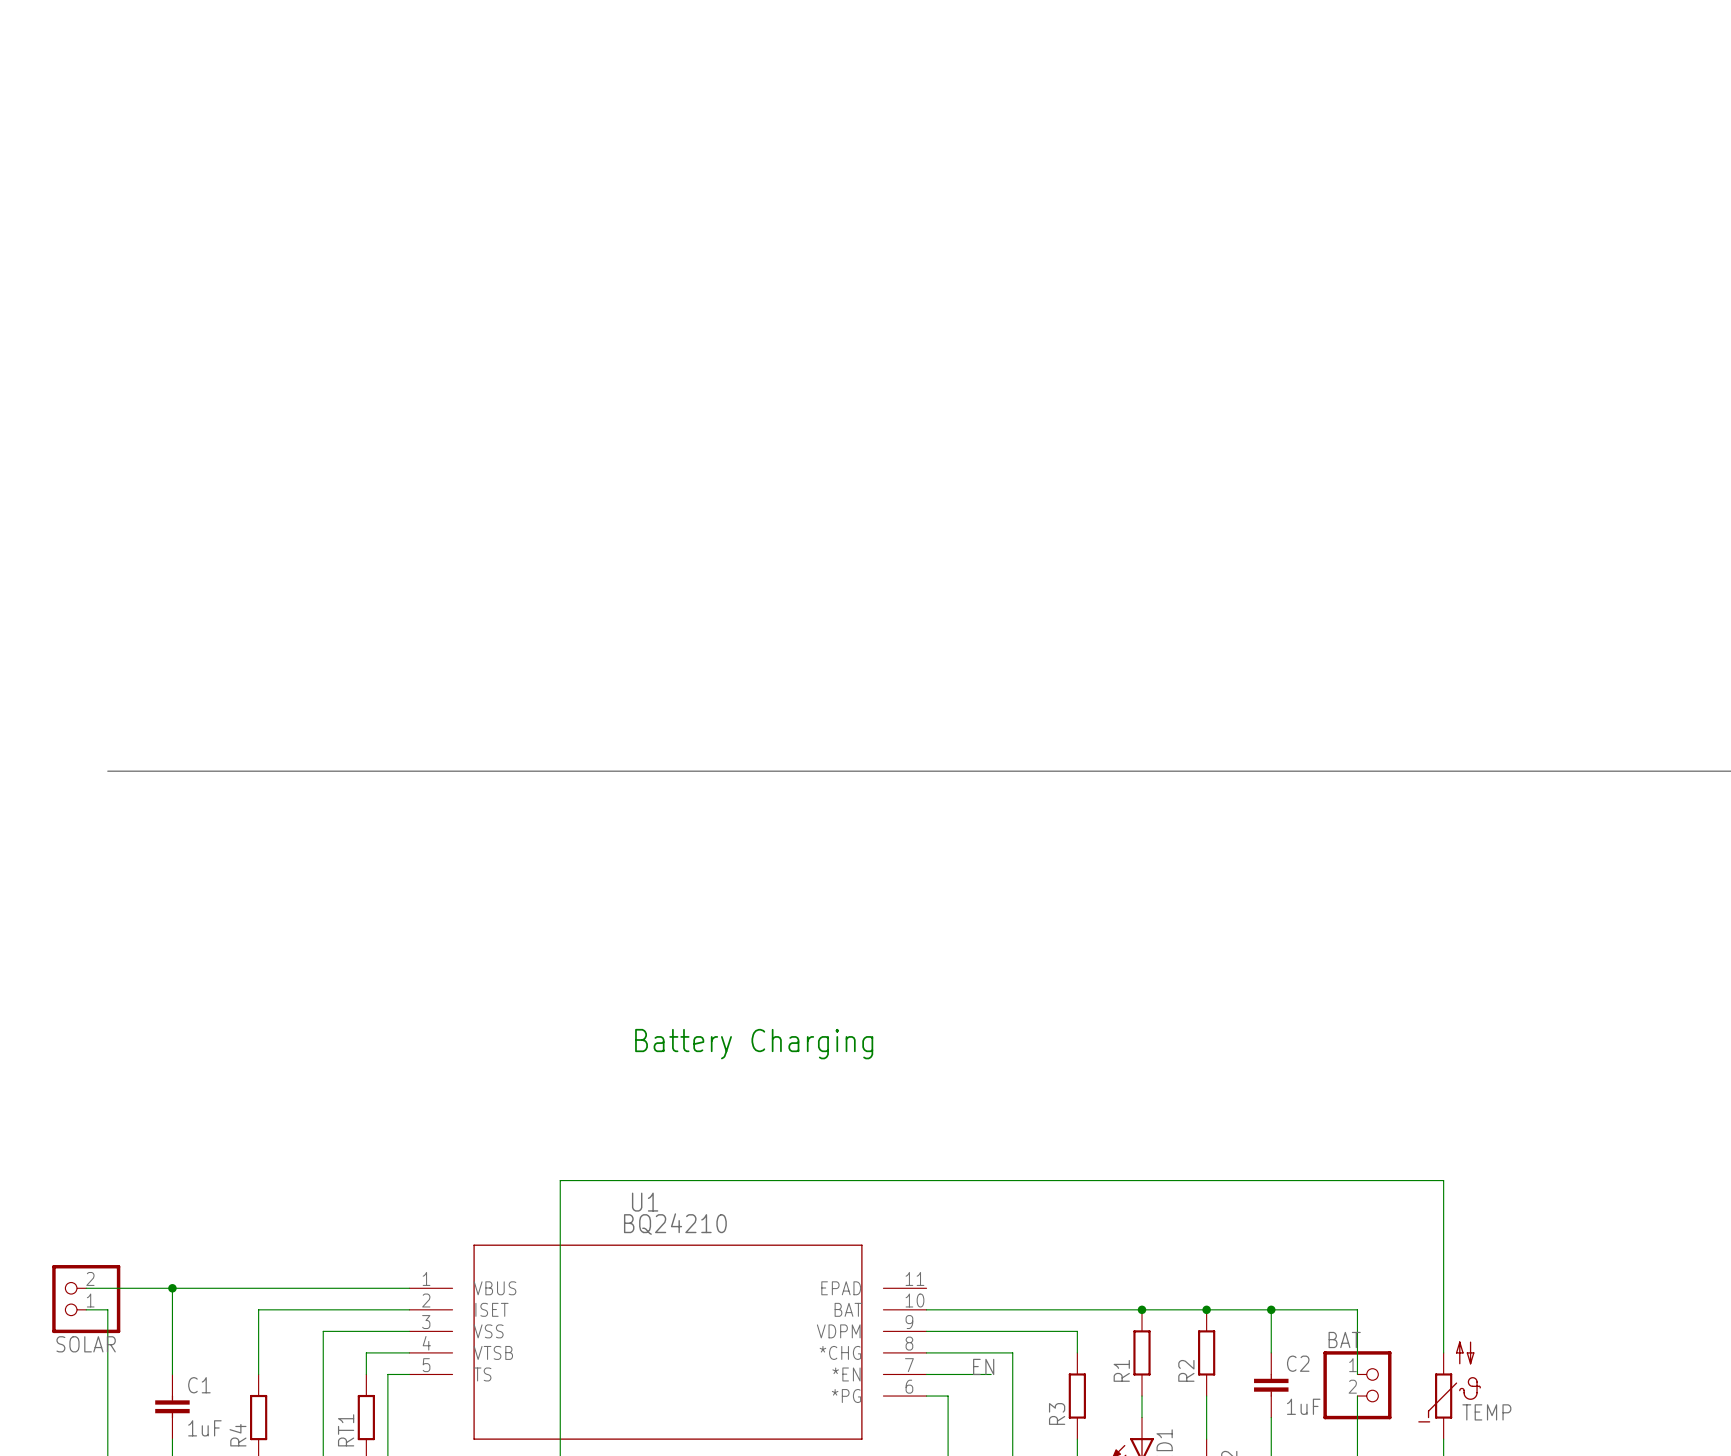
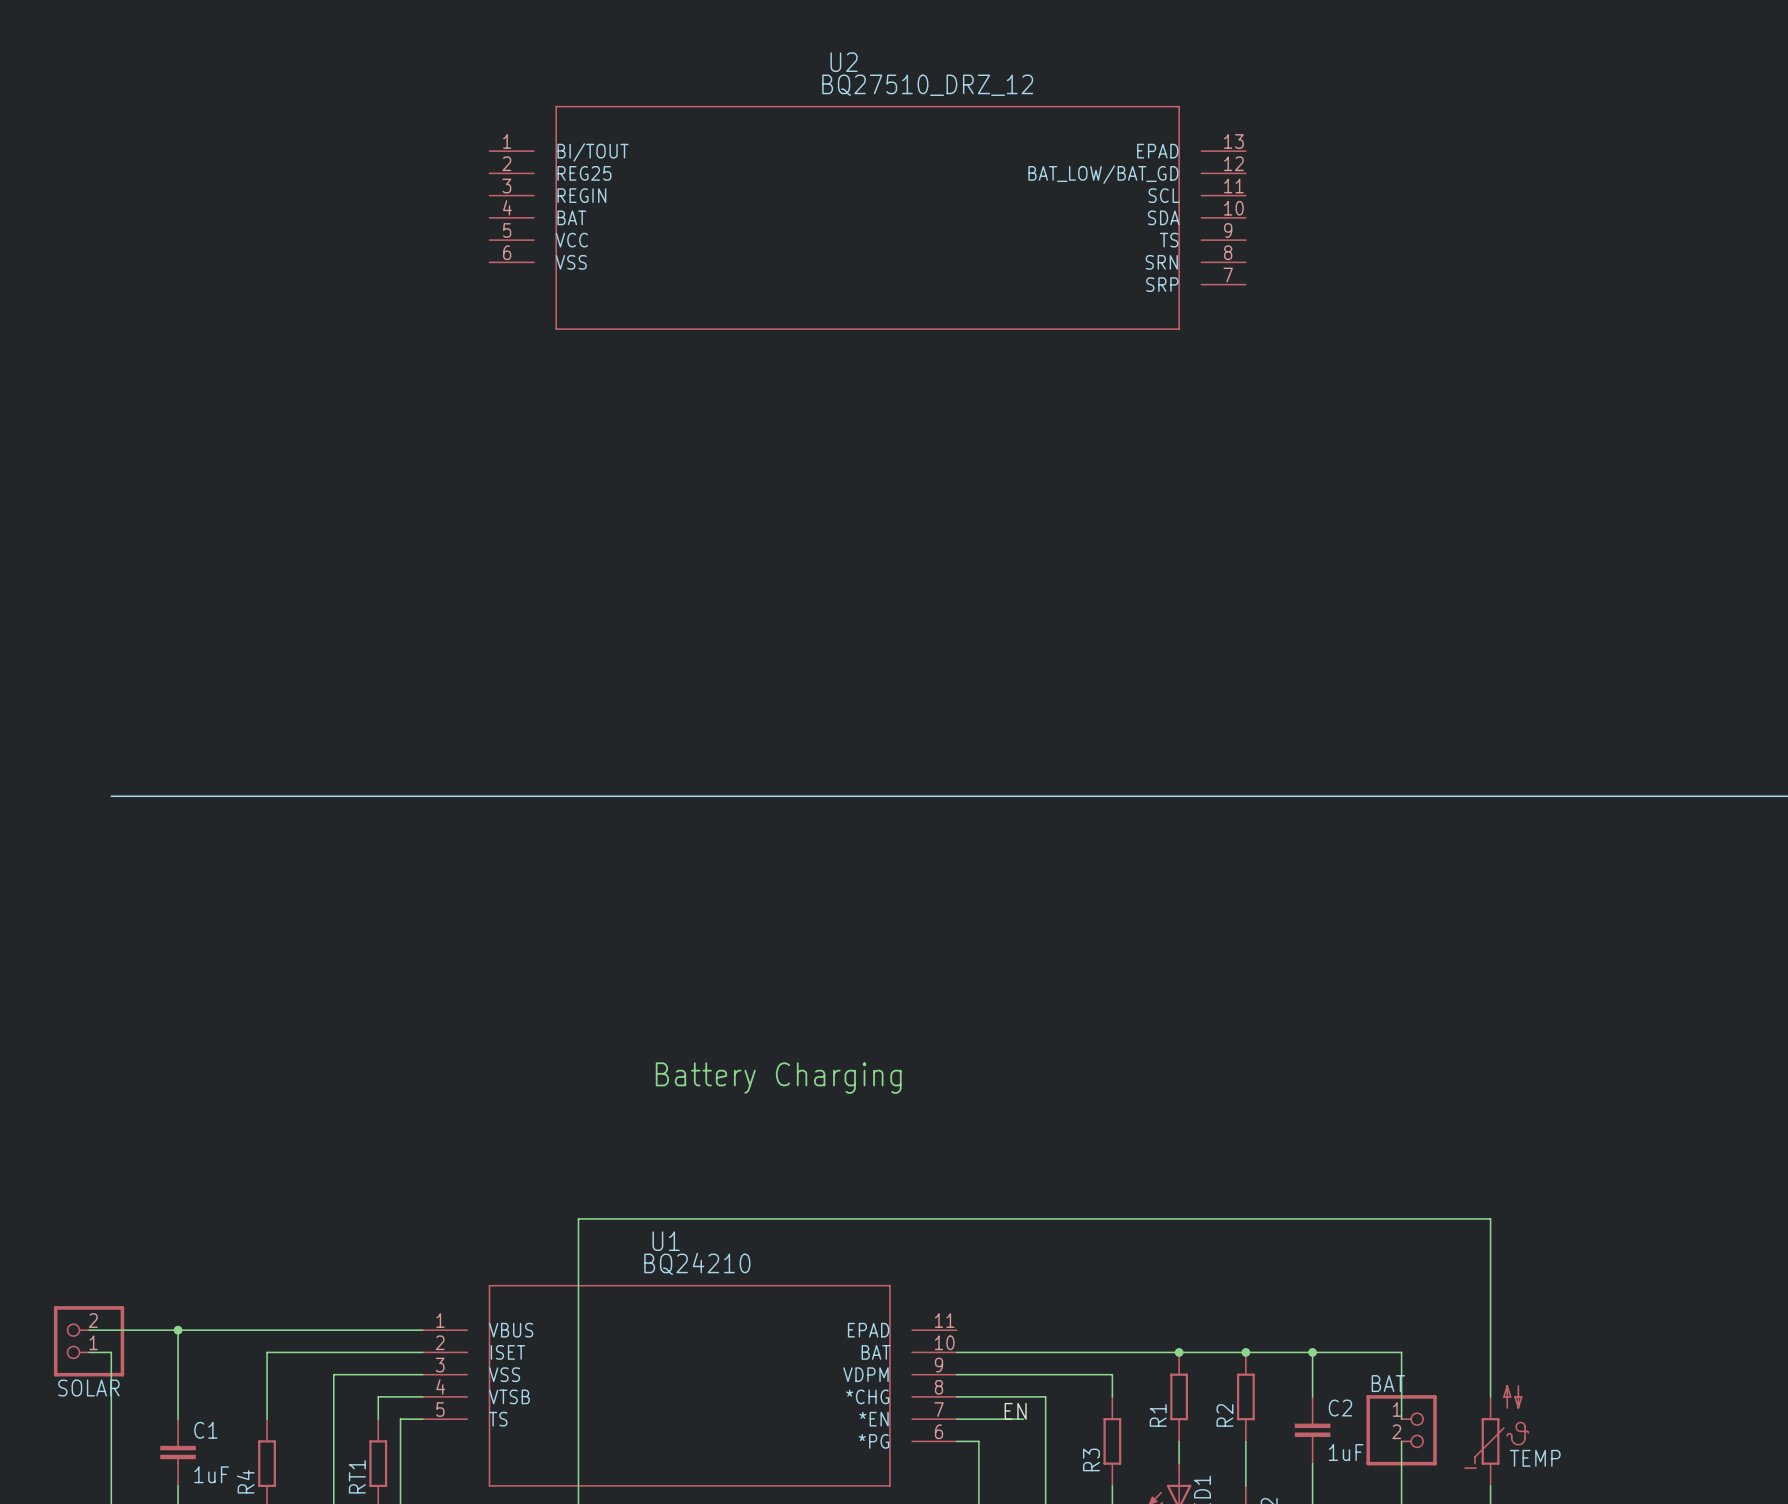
U2: none -> BQ27510_DRZ_12 (867, 217)

